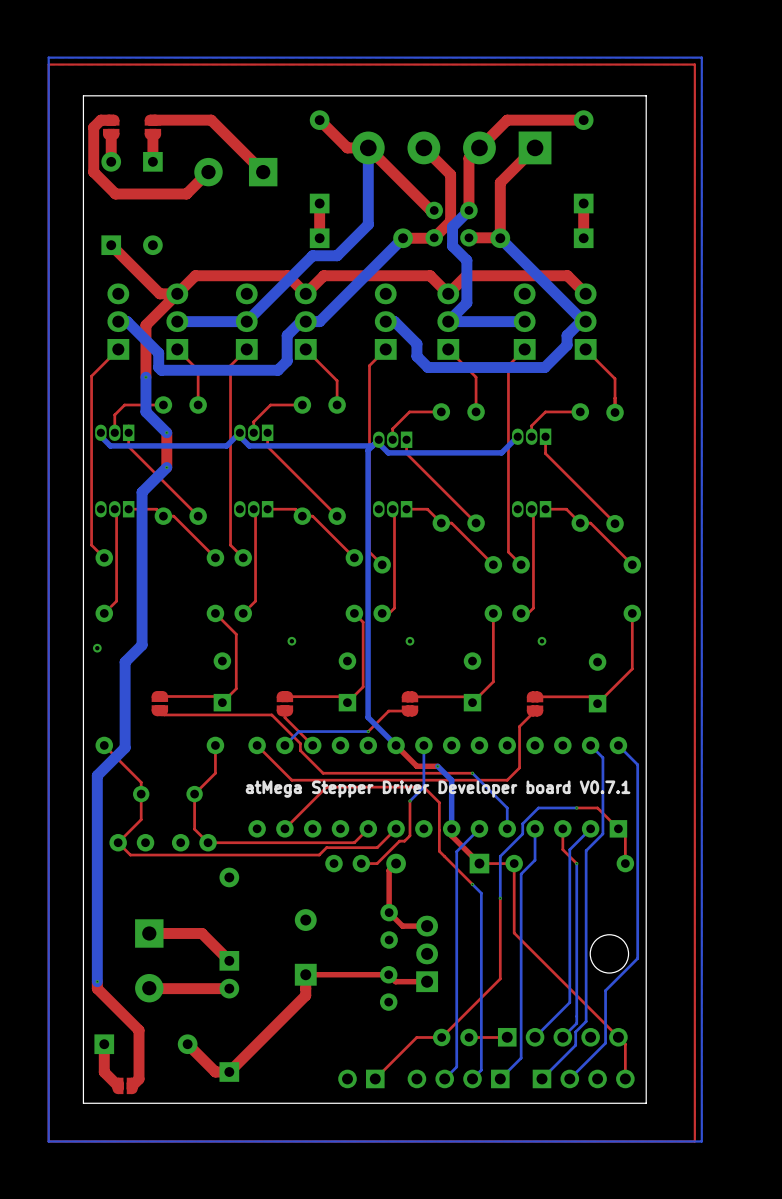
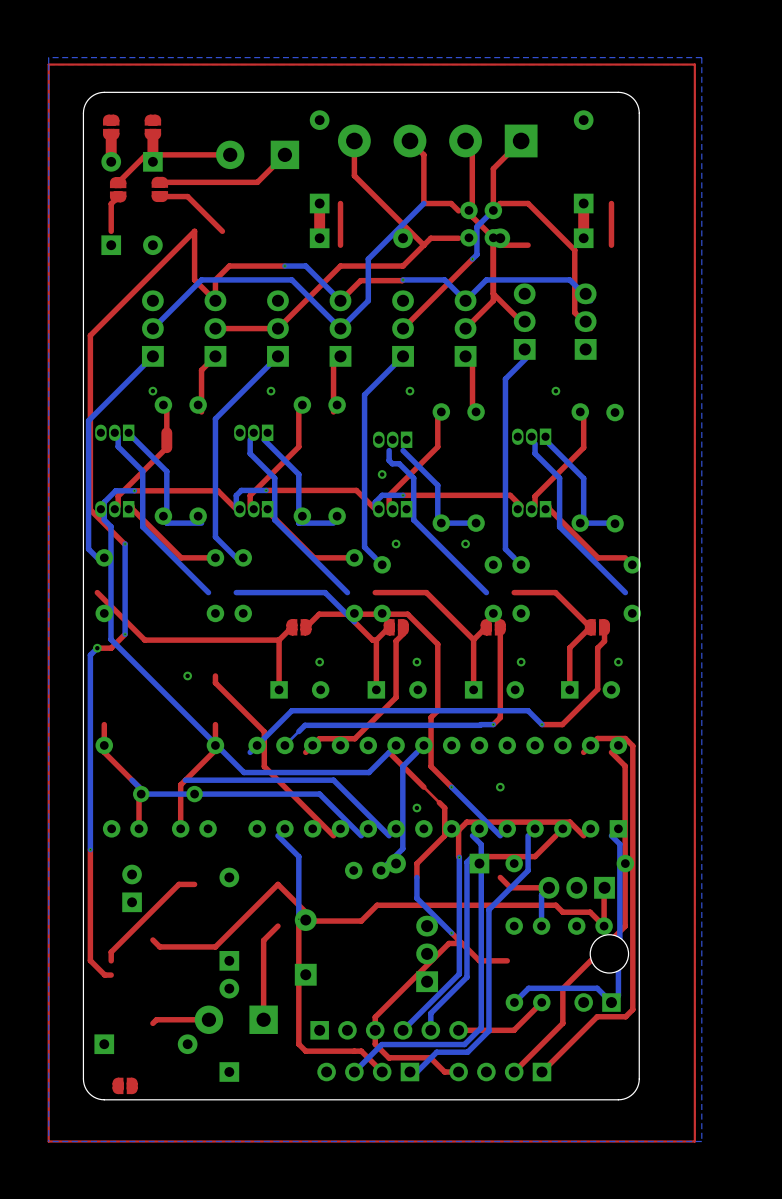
bottom track: (701, 57) (48, 57) (48, 1141) (701, 1141) (701, 57) -> none
board edge: (83, 113) (83, 95) (646, 95) (646, 1103) (83, 1103) (83, 1078) -> (83, 113) (85, 105) (89, 98) (96, 93) (104, 92) (618, 92) (626, 93) (633, 98) (637, 105) (639, 113) (639, 1078) (636, 1089) (628, 1097) (618, 1099) (104, 1099) (96, 1098) (89, 1093) (85, 1086) (83, 1078)
top track: (111, 120) (100, 120) (93, 127) (93, 172) (115, 193) (186, 193) (208, 172) -> none
top track: (152, 120) (211, 120) (263, 172) -> none
top track: (319, 120) (347, 147) (368, 147) (430, 210) (434, 210) -> none
top track: (583, 120) (507, 120) (468, 158) (468, 210) -> none
top track: none -> (354, 140) (354, 175) (423, 245)
top track: none -> (409, 140) (423, 154) (423, 203) (451, 203) (458, 210)
top track: none -> (465, 140) (472, 147) (472, 216) (500, 245) (528, 245)
top track: none -> (521, 140) (493, 168) (493, 210) (500, 203) (528, 203) (574, 250) (574, 312) (590, 328)
bottom track: (368, 147) (368, 224) (337, 255) (312, 255) (246, 321) (177, 321) -> none
top track: (423, 147) (450, 174) (450, 221) (433, 238) -> (458, 238) (433, 238)
part position: (451, 147) -> (437, 140)
top track: (535, 147) (500, 182) (500, 238) (468, 237) -> none
top track: none -> (230, 154) (145, 154) (118, 182)
top track: none -> (284, 154) (257, 182) (159, 182)
part position: (235, 172) -> (257, 154)
part: none -> (118, 189)
part: none -> (159, 189)
top track: none -> (118, 196) (111, 203) (111, 231)
top track: none -> (159, 196) (187, 196) (222, 231)
top track: none -> (340, 203) (340, 245)
bottom track: none -> (423, 203) (368, 259) (368, 300) (340, 328) (291, 279) (201, 279) (152, 328)
top track: none -> (611, 203) (611, 245)
bottom track: (468, 210) (452, 226) (452, 246) (466, 260) (466, 303) (448, 321) (524, 321) -> none
bottom track: none -> (493, 210) (476, 226) (476, 254) (472, 259)
part position: (434, 224) -> (493, 224)
top track: none -> (493, 237) (493, 300) (465, 328)
bottom track: (403, 238) (319, 321) (301, 321) (287, 335) (287, 361) (277, 370) (161, 370) (158, 367) (158, 353) (127, 321) (118, 321) -> none
top track: (430, 238) (403, 238) -> (430, 238) (403, 266) (340, 266) (277, 328) (215, 328)
bottom track: (500, 238) (583, 321) -> none
top track: (111, 245) (159, 293) (177, 293) -> none
top track: none -> (472, 259) (403, 328)
via: none -> (472, 259)
top track: none -> (284, 266) (229, 266) (215, 279) (215, 300) (194, 279) (194, 231) (90, 335) (90, 509) (125, 543)
bottom track: none -> (284, 266) (305, 266) (340, 300)
via: none -> (284, 266)
top track: none -> (403, 279) (360, 280) (340, 300)
bottom track: none -> (403, 279) (444, 279) (465, 300) (486, 279) (569, 279) (590, 300)
via: none -> (403, 279)
top track: none -> (493, 293) (528, 328)
top track: (585, 293) (567, 275) (466, 275) (448, 293) (430, 275) (323, 275) (305, 293) (287, 275) (195, 275) (145, 325) (145, 377) -> none
part: (118, 321) -> none
part: (177, 321) -> none
part: (246, 321) -> none
part: (305, 321) -> none
part position: (385, 321) -> (403, 328)
part position: (448, 321) -> (465, 328)
bottom track: (585, 321) (580, 321) (567, 335) (567, 345) (544, 367) (428, 367) (416, 356) (416, 343) (394, 321) (385, 321) -> none
part: none -> (152, 328)
part: none -> (215, 328)
part: none -> (277, 328)
part: none -> (340, 328)
top track: (118, 349) (91, 376) (91, 545) (104, 557) -> none
top track: (177, 349) (198, 370) (198, 405) -> none
top track: (246, 349) (230, 365) (230, 545) (243, 557) -> none
top track: (305, 349) (337, 380) (337, 405) -> none
top track: (385, 349) (369, 365) (369, 552) (382, 564) -> none
top track: (448, 349) (476, 377) (476, 411) -> none
top track: (524, 349) (508, 365) (508, 552) (521, 564) -> none
top track: (585, 349) (615, 378) (615, 412) -> none
bottom track: none -> (152, 356) (88, 420) (88, 549) (97, 557)
top track: none -> (215, 356) (201, 370) (201, 411)
bottom track: none -> (277, 356) (215, 418) (215, 537) (236, 557)
top track: none -> (340, 356) (333, 363) (333, 411)
bottom track: none -> (403, 356) (364, 394) (364, 547) (375, 557)
top track: none -> (465, 356) (472, 363) (472, 411)
bottom track: none -> (528, 356) (505, 379) (505, 549) (514, 557)
bottom track: (145, 377) (145, 411) (166, 432) -> none
via: (145, 377) -> none
via: none -> (152, 391)
via: none -> (271, 391)
via: none -> (409, 391)
via: none -> (555, 391)
top track: (163, 405) (124, 405) (114, 414) (114, 425) -> none
top track: (302, 405) (270, 405) (253, 421) (253, 432) -> none
top track: none -> (166, 411) (166, 432)
top track: none -> (298, 411) (298, 446) (250, 495) (250, 509)
top track: none -> (437, 411) (437, 446) (389, 495) (389, 509)
top track: (441, 411) (409, 411) (392, 428) (392, 439) -> none
top track: (580, 411) (545, 411) (531, 425) (531, 436) -> none
top track: none -> (583, 411) (583, 447) (535, 496) (535, 506)
top track: (128, 425) (128, 446) (198, 516) -> none
bottom track: (100, 432) (100, 436) (110, 445) (226, 445) (239, 432) (239, 436) (249, 445) (372, 445) -> none
via: (166, 432) -> none
top track: (267, 432) (267, 446) (337, 516) -> none
bottom track: none -> (118, 436) (118, 446) (142, 471) (142, 526) (208, 592)
bottom track: none -> (132, 436) (166, 471) (166, 523) (201, 523)
bottom track: (517, 436) (501, 452) (388, 452) (378, 443) (378, 439) (368, 450) (368, 717) (396, 745) -> none
top track: (545, 436) (545, 453) (615, 523) -> none
bottom track: none -> (250, 439) (250, 453) (274, 478) (274, 519) (347, 592)
bottom track: none -> (264, 439) (298, 474) (298, 523) (333, 523)
top track: (406, 439) (406, 453) (476, 523) -> none
bottom track: none -> (535, 443) (535, 453) (559, 478) (559, 526) (625, 592)
bottom track: none -> (548, 443) (583, 478) (583, 523) (618, 523)
top track: (166, 447) (166, 467) -> (166, 447) (118, 496) (118, 506)
bottom track: none -> (389, 450) (389, 460) (392, 463) (399, 463) (413, 478) (413, 519) (486, 592)
bottom track: none -> (403, 450) (437, 485) (437, 523) (472, 523)
bottom track: (166, 467) (142, 492) (142, 645) (125, 662) (125, 747) (97, 775) (97, 981) -> none
via: (166, 467) -> none
via: none -> (382, 474)
top track: none -> (134, 490) (217, 490) (236, 509)
bottom track: none -> (134, 490) (115, 490) (104, 502) (104, 519) (111, 526) (111, 639) (244, 772) (369, 772) (389, 752)
via: none -> (134, 490)
top track: none -> (266, 490) (356, 490) (375, 509)
bottom track: none -> (266, 490) (241, 490) (236, 495) (236, 509)
via: none -> (266, 490)
top track: none -> (403, 495) (510, 495) (521, 506)
bottom track: none -> (403, 495) (382, 495) (375, 502) (375, 509)
via: none -> (403, 495)
top track: (255, 504) (255, 601) (250, 606) -> none
top track: none -> (132, 506) (132, 508) (181, 557) (208, 557)
top track: none -> (548, 506) (548, 508) (598, 557) (625, 557)
top track: (114, 509) (116, 511) (116, 601) (111, 606) -> none
top track: (128, 509) (156, 509) (163, 516) (173, 516) (215, 557) -> none
top track: none -> (264, 509) (314, 557) (347, 557)
top track: (267, 509) (295, 509) (302, 516) (312, 516) (354, 557) -> none
top track: (392, 509) (394, 511) (394, 608) (389, 613) -> none
top track: (406, 509) (427, 509) (441, 523) (451, 523) (493, 564) -> none
top track: (531, 509) (533, 511) (533, 608) (528, 613) -> none
top track: (545, 509) (566, 509) (580, 523) (590, 523) (632, 564) -> none
bottom track: none -> (125, 543) (125, 634)
via: none -> (125, 543)
via: none -> (396, 543)
via: none -> (465, 543)
top track: none -> (97, 592) (144, 640) (279, 640)
bottom track: none -> (236, 592) (325, 592) (354, 621)
top track: none -> (375, 592) (426, 592) (473, 639)
top track: none -> (514, 592) (555, 592) (590, 627) (569, 647) (569, 689)
top track: (215, 613) (236, 634) (236, 688) (222, 702) (216, 696) (159, 696) -> none
top track: (354, 613) (363, 622) (363, 686) (347, 702) (341, 696) (284, 696) -> none
top track: (493, 613) (493, 681) (472, 702) (466, 696) (409, 696) -> none
top track: (632, 613) (632, 668) (597, 703) (590, 696) (535, 696) -> none
top track: none -> (354, 621) (372, 640) (376, 640)
top track: none -> (291, 627) (279, 640)
part: none -> (298, 627)
top track: none -> (306, 627) (319, 614) (407, 614) (437, 644) (437, 710) (431, 717) (431, 766) (451, 787)
top track: none -> (389, 627) (376, 640)
part: none -> (396, 627)
top track: none -> (403, 627) (403, 633) (396, 641) (396, 697) (354, 738) (319, 738) (305, 752)
top track: none -> (486, 627) (473, 639)
part: none -> (493, 627)
top track: none -> (500, 627) (500, 717) (493, 724)
part: none -> (597, 627)
top track: none -> (604, 627) (604, 641) (597, 648) (597, 689) (562, 724) (541, 724)
top track: none -> (125, 634) (111, 648) (97, 648)
via: none -> (125, 634)
top track: none -> (473, 639) (473, 689)
top track: none -> (279, 640) (279, 689)
top track: none -> (376, 640) (376, 689)
via position: (291, 641) -> (319, 662)
via position: (409, 641) -> (416, 662)
via position: (541, 641) -> (521, 662)
bottom track: none -> (97, 648) (90, 655) (90, 849)
via: none -> (618, 662)
via: none -> (187, 675)
top track: none -> (215, 675) (215, 682) (264, 731) (264, 766) (333, 835)
part: (222, 681) -> none
part: (347, 681) -> none
part rotation: 0° (472, 681) -> 90° clockwise (494, 689)
part rotation: 0° (597, 682) -> 90° clockwise (590, 689)
part: none -> (299, 689)
part: none -> (397, 689)
part: (159, 703) -> none
part: (284, 703) -> none
part: (409, 703) -> none
part: (535, 703) -> none
top track: (159, 710) (164, 714) (271, 714) (300, 743) (300, 750) (323, 773) (472, 773) -> none
top track: (284, 710) (284, 717) (312, 745) -> none
top track: (409, 711) (388, 711) (368, 731) -> none
top track: (535, 711) (519, 726) (519, 767) (507, 780) (291, 780) (257, 745) -> none
top track: none -> (104, 724) (104, 752) (139, 787) (139, 828)
top track: none -> (215, 724) (215, 745)
via: none -> (493, 724)
bottom track: none -> (541, 724) (528, 710) (291, 710) (250, 752)
via: none -> (541, 724)
bottom track: (368, 731) (298, 731) -> (493, 724) (305, 725) (298, 731)
via: (368, 731) -> none
top track: (104, 745) (141, 782) (141, 819) (118, 842) (130, 855) (319, 855) (326, 847) (377, 847) (396, 828) -> none
top track: (396, 745) (416, 766) (437, 766) -> none
bottom track: (423, 745) (423, 787) (409, 801) -> none
bottom track: (590, 745) (602, 757) (602, 833) (586, 850) (586, 1021) (575, 1031) (575, 1045) (541, 1078) -> none
bottom track: (618, 745) (637, 764) (637, 958) (605, 990) (605, 1043) (569, 1078) -> none
top track: (215, 750) (215, 773) (194, 794) (194, 829) (208, 842) (354, 842) (368, 828) -> (215, 750) (180, 784) (180, 828)
bottom track: none -> (416, 752) (402, 766) (402, 848) (381, 870)
top track: none -> (583, 752) (597, 738) (625, 738) (632, 745) (632, 1009) (625, 1016) (597, 1016) (541, 1072)
top track: none -> (611, 752) (625, 766) (625, 926) (562, 988) (562, 1023) (514, 1072)
bottom track: (437, 766) (451, 780) (451, 828) -> none
via: (437, 766) -> none
bottom track: (472, 773) (507, 807) (507, 828) -> none
via: (472, 773) -> none
bottom track: none -> (132, 780) (145, 794) (319, 794) (361, 835)
bottom track: none -> (185, 780) (333, 780) (389, 835)
top track: (423, 787) (326, 787) (284, 828) -> (423, 787) (389, 752)
bottom track: none -> (451, 787) (500, 835)
via: none -> (451, 787)
via: none -> (500, 787)
text: atMega Stepper Driver Developer board V0.7.1 (438, 789) -> none
top track: (409, 801) (409, 835) (404, 841) (399, 841) (377, 863) (361, 863) -> none
via: (409, 801) -> none
top track: (439, 802) (439, 851) (472, 884) -> (439, 802) (444, 807) (444, 835) (416, 863) (416, 877)
via: none -> (416, 807)
top track: (576, 807) (597, 807) (625, 835) (625, 863) -> none
bottom track: (576, 807) (538, 807) (522, 823) (522, 833) (500, 856) (500, 898) -> none
via: (576, 807) -> none
top track: (451, 828) (451, 835) (479, 863) (514, 863) (514, 933) (625, 1044) (625, 1078) -> none
bottom track: (479, 828) (456, 851) (456, 1066) (444, 1078) -> none
bottom track: (535, 828) (535, 860) (521, 874) (521, 1058) (500, 1078) -> none
top track: (562, 828) (562, 849) (576, 863) -> none
bottom track: (590, 828) (569, 849) (569, 1002) (535, 1037) -> none
bottom track: none -> (277, 835) (298, 856) (298, 919)
bottom track: none -> (472, 835) (481, 844) (481, 1027) (464, 1044) (381, 1044) (354, 1072)
bottom track: none -> (528, 835) (528, 870) (488, 909) (488, 1030) (467, 1052) (436, 1052) (416, 1072) (409, 1072)
top track: none -> (555, 835) (535, 856) (472, 856)
top track: none -> (583, 835) (570, 822) (466, 822) (458, 830) (459, 857)
bottom track: none -> (611, 835) (619, 844) (618, 995) (611, 1002) (597, 988) (528, 988) (514, 1002)
part position: (131, 842) -> (125, 828)
part position: (194, 842) -> (194, 828)
top track: none -> (90, 849) (90, 960) (104, 975) (111, 975)
via: none -> (90, 849)
bottom track: none -> (472, 856) (466, 862) (466, 977) (430, 1013) (430, 1030)
bottom track: none -> (459, 857) (459, 974) (403, 1030)
via: none -> (459, 857)
part position: (347, 863) -> (367, 870)
top track: (396, 863) (389, 870) (389, 912) (402, 926) (427, 926) -> none
bottom track: (576, 863) (576, 1023) (562, 1037) -> none
via: (576, 863) -> none
bottom track: none -> (416, 877) (416, 898) (451, 933)
top track: none -> (500, 877) (510, 887) (548, 887)
top track: none -> (194, 884) (178, 884) (111, 952) (111, 960)
bottom track: (472, 884) (481, 893) (481, 1070) (472, 1078) -> none
via: (472, 884) -> none
bottom track: none -> (548, 887) (541, 895) (541, 926)
part: none -> (576, 887)
top track: none -> (604, 887) (604, 926) (590, 912) (562, 912) (555, 905) (377, 905) (361, 921) (314, 921) (277, 884) (215, 946) (159, 946) (152, 940)
part: none -> (132, 888)
top track: (500, 898) (500, 978) (441, 1037) (416, 1037) (375, 1078) -> none
via: (500, 898) -> none
top track: none -> (298, 919) (298, 1044) (305, 1051) (361, 1051) (382, 1072)
top track: none -> (277, 926) (263, 940) (263, 1019)
part: (389, 926) -> none
part: none -> (527, 926)
part: none -> (590, 926)
top track: (149, 933) (201, 933) (229, 960) -> none
top track: none -> (451, 933) (479, 960) (507, 960)
via: none -> (451, 933)
top track: none -> (462, 943) (448, 943) (375, 1017) (375, 1044) (389, 1058) (430, 1057) (444, 1072) (458, 1072)
part rotation: 0° (149, 960) -> 90° clockwise (236, 1019)
part position: (149, 960) -> (236, 1019)
top track: (97, 981) (97, 988) (139, 1030) (139, 1079) (132, 1085) -> none
via: (97, 981) -> none
top track: (427, 981) (395, 981) (388, 974) (305, 974) (305, 995) (229, 1072) (215, 1072) (187, 1044) -> none
top track: (149, 988) (229, 988) -> none
part: (388, 988) -> none
part: none -> (528, 1002)
top track: none -> (541, 1002) (513, 1030) (458, 1030)
part: none -> (597, 1002)
top track: none -> (208, 1019) (156, 1019) (152, 1023)
part: none -> (389, 1030)
part: (455, 1037) -> none
top track: (507, 1037) (469, 1037) -> none
part: (562, 1037) -> none
top track: (104, 1044) (104, 1072) (118, 1085) -> none
part footprint: [338, 1069, 385, 1089] -> [317, 1062, 420, 1082]
part: none -> (500, 1072)
part: (458, 1078) -> none
part: (583, 1078) -> none

